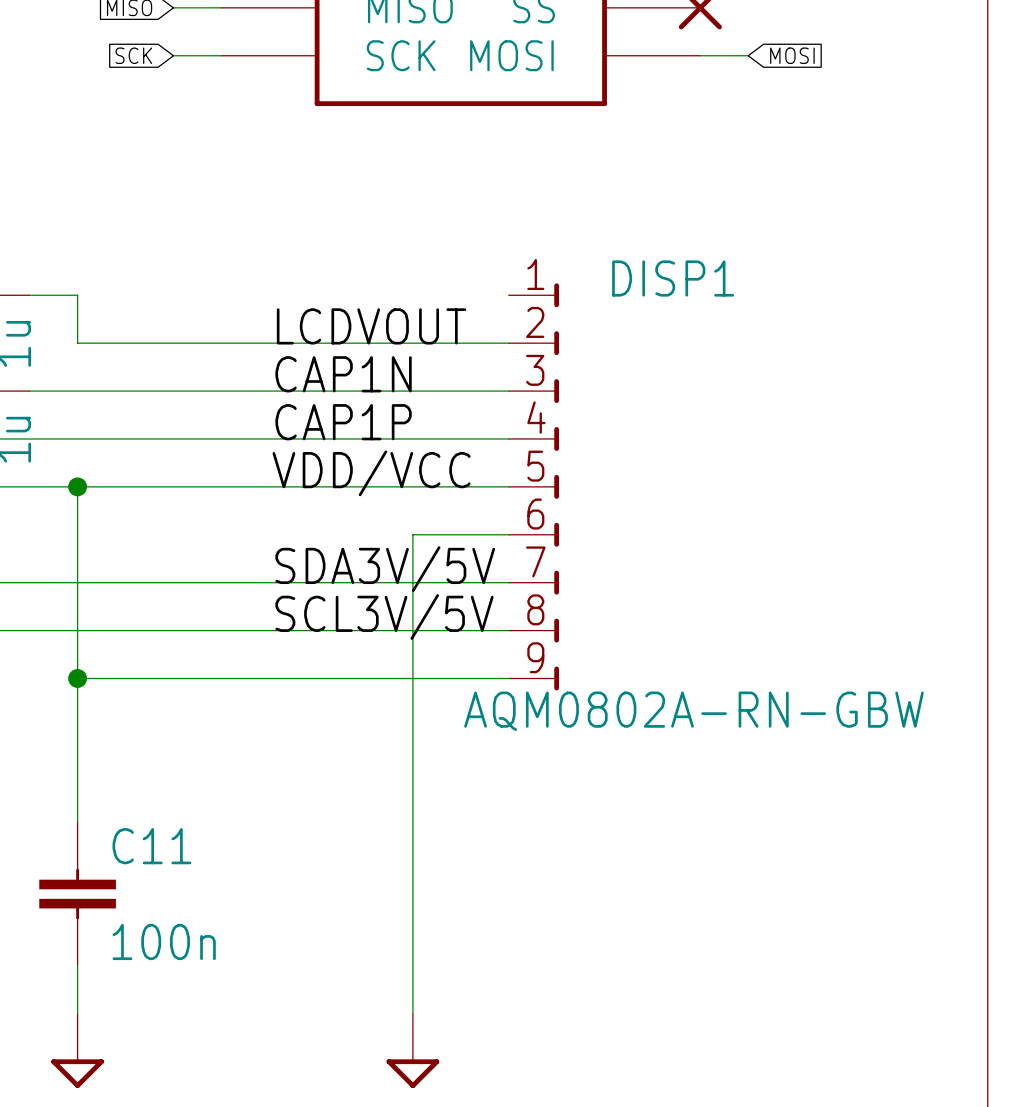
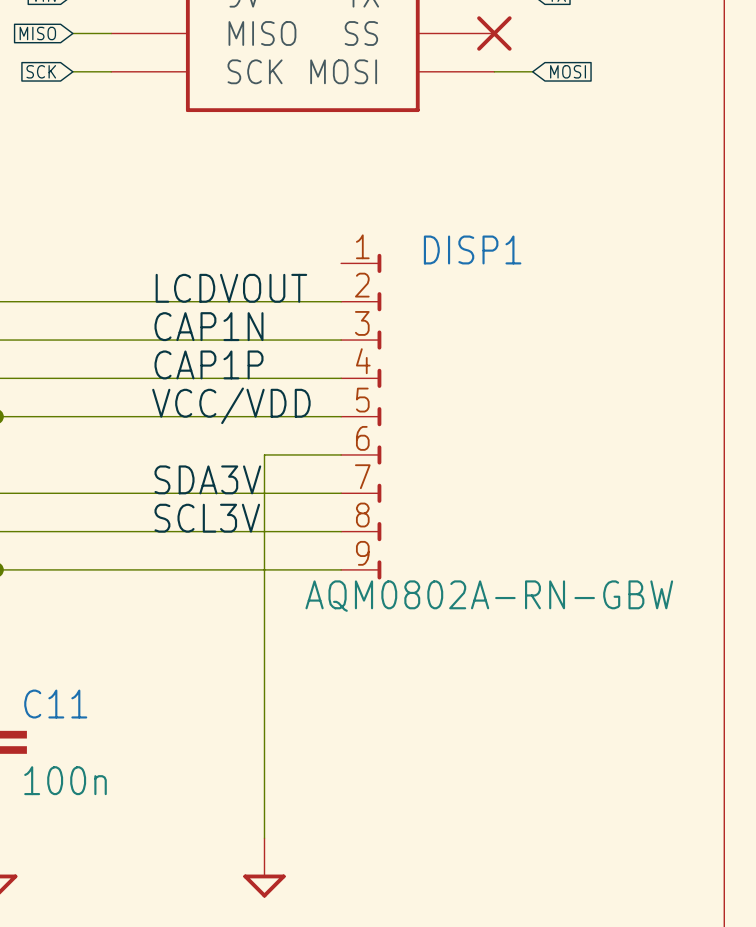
label: VDD/VCC (371, 473) -> VCC/VDD (231, 405)
label: SDA3V/5V (385, 569) -> SDA3V (207, 479)
label: SCL3V/5V (384, 617) -> SCL3V (207, 518)

